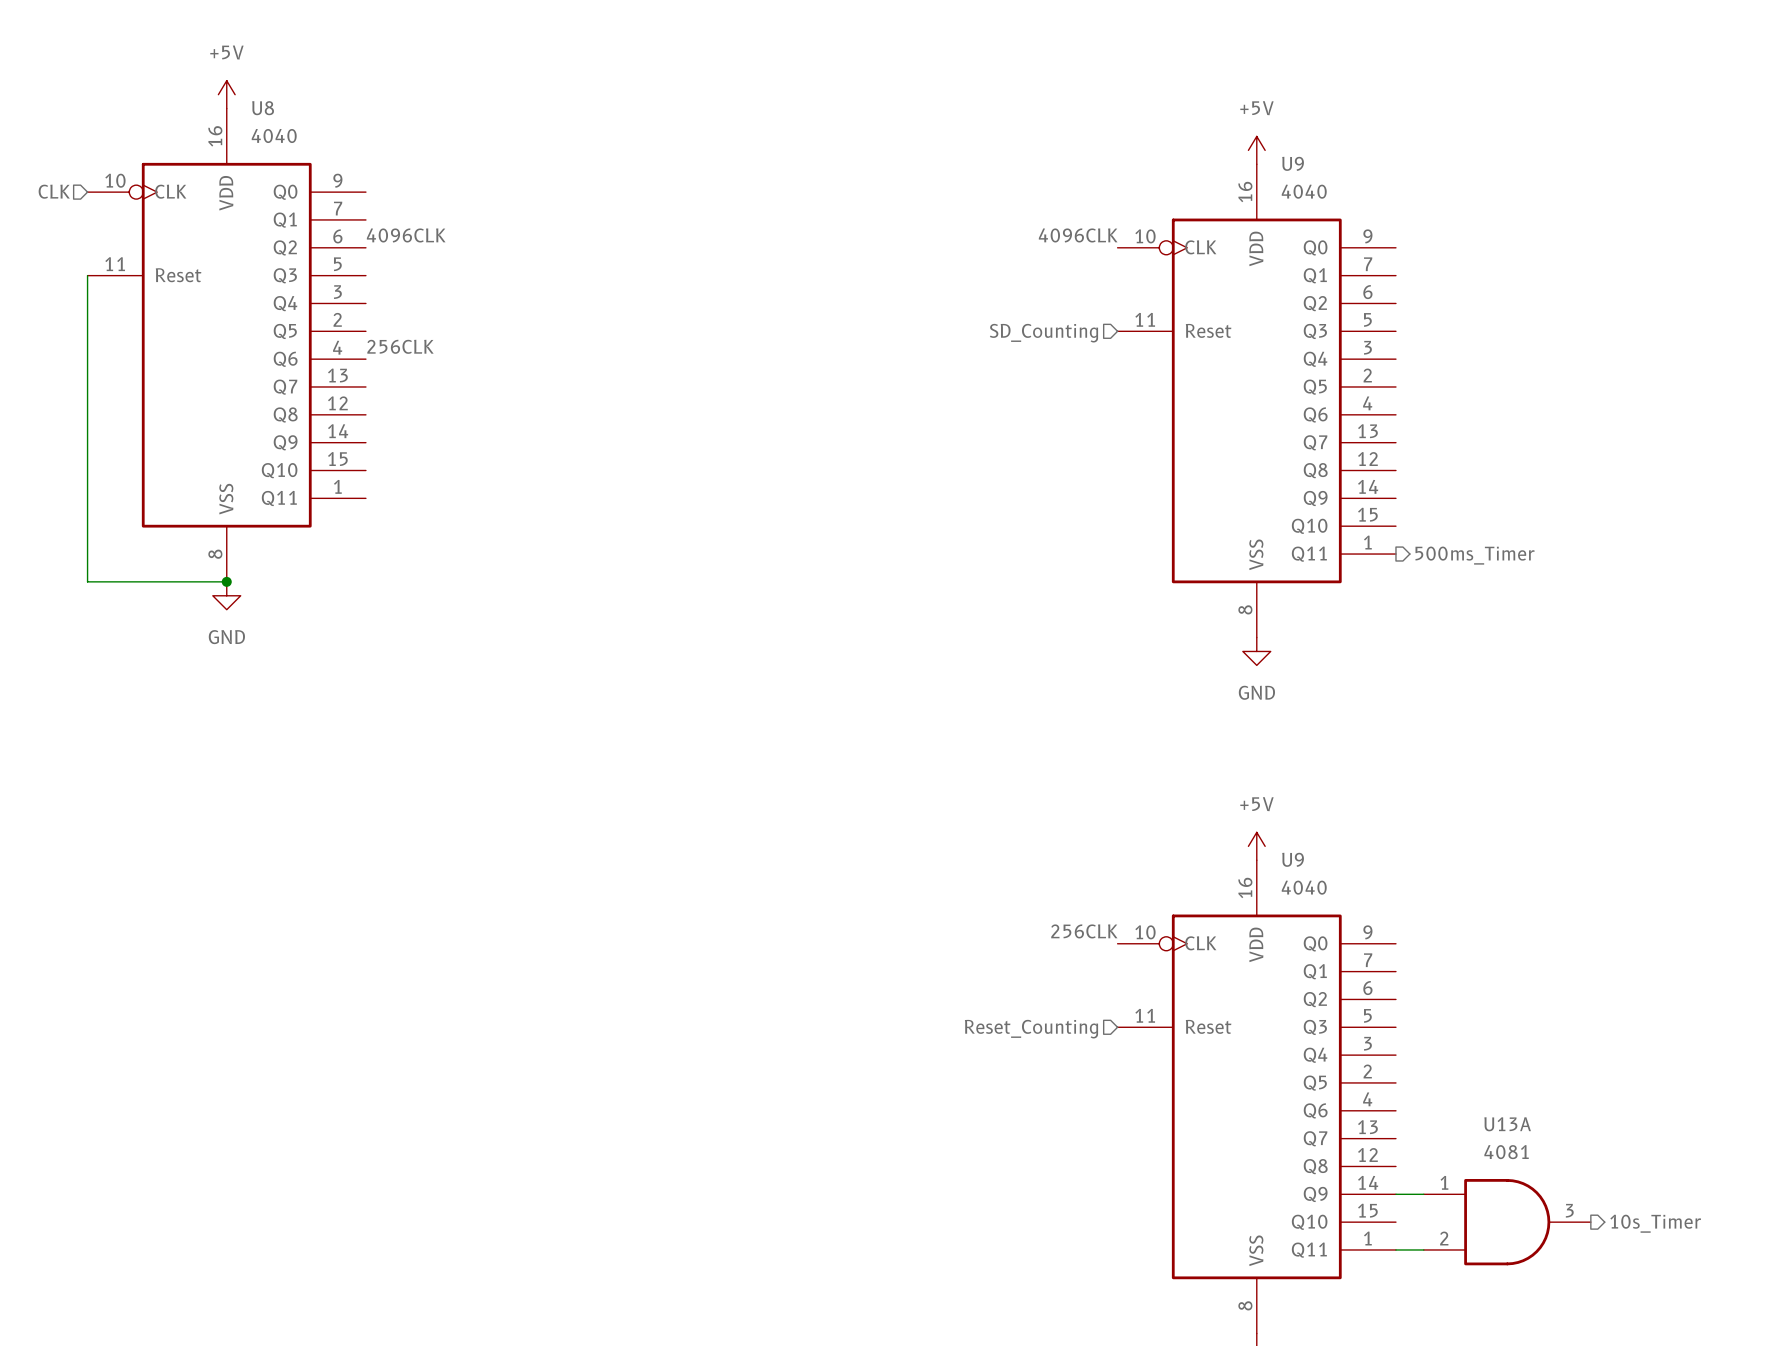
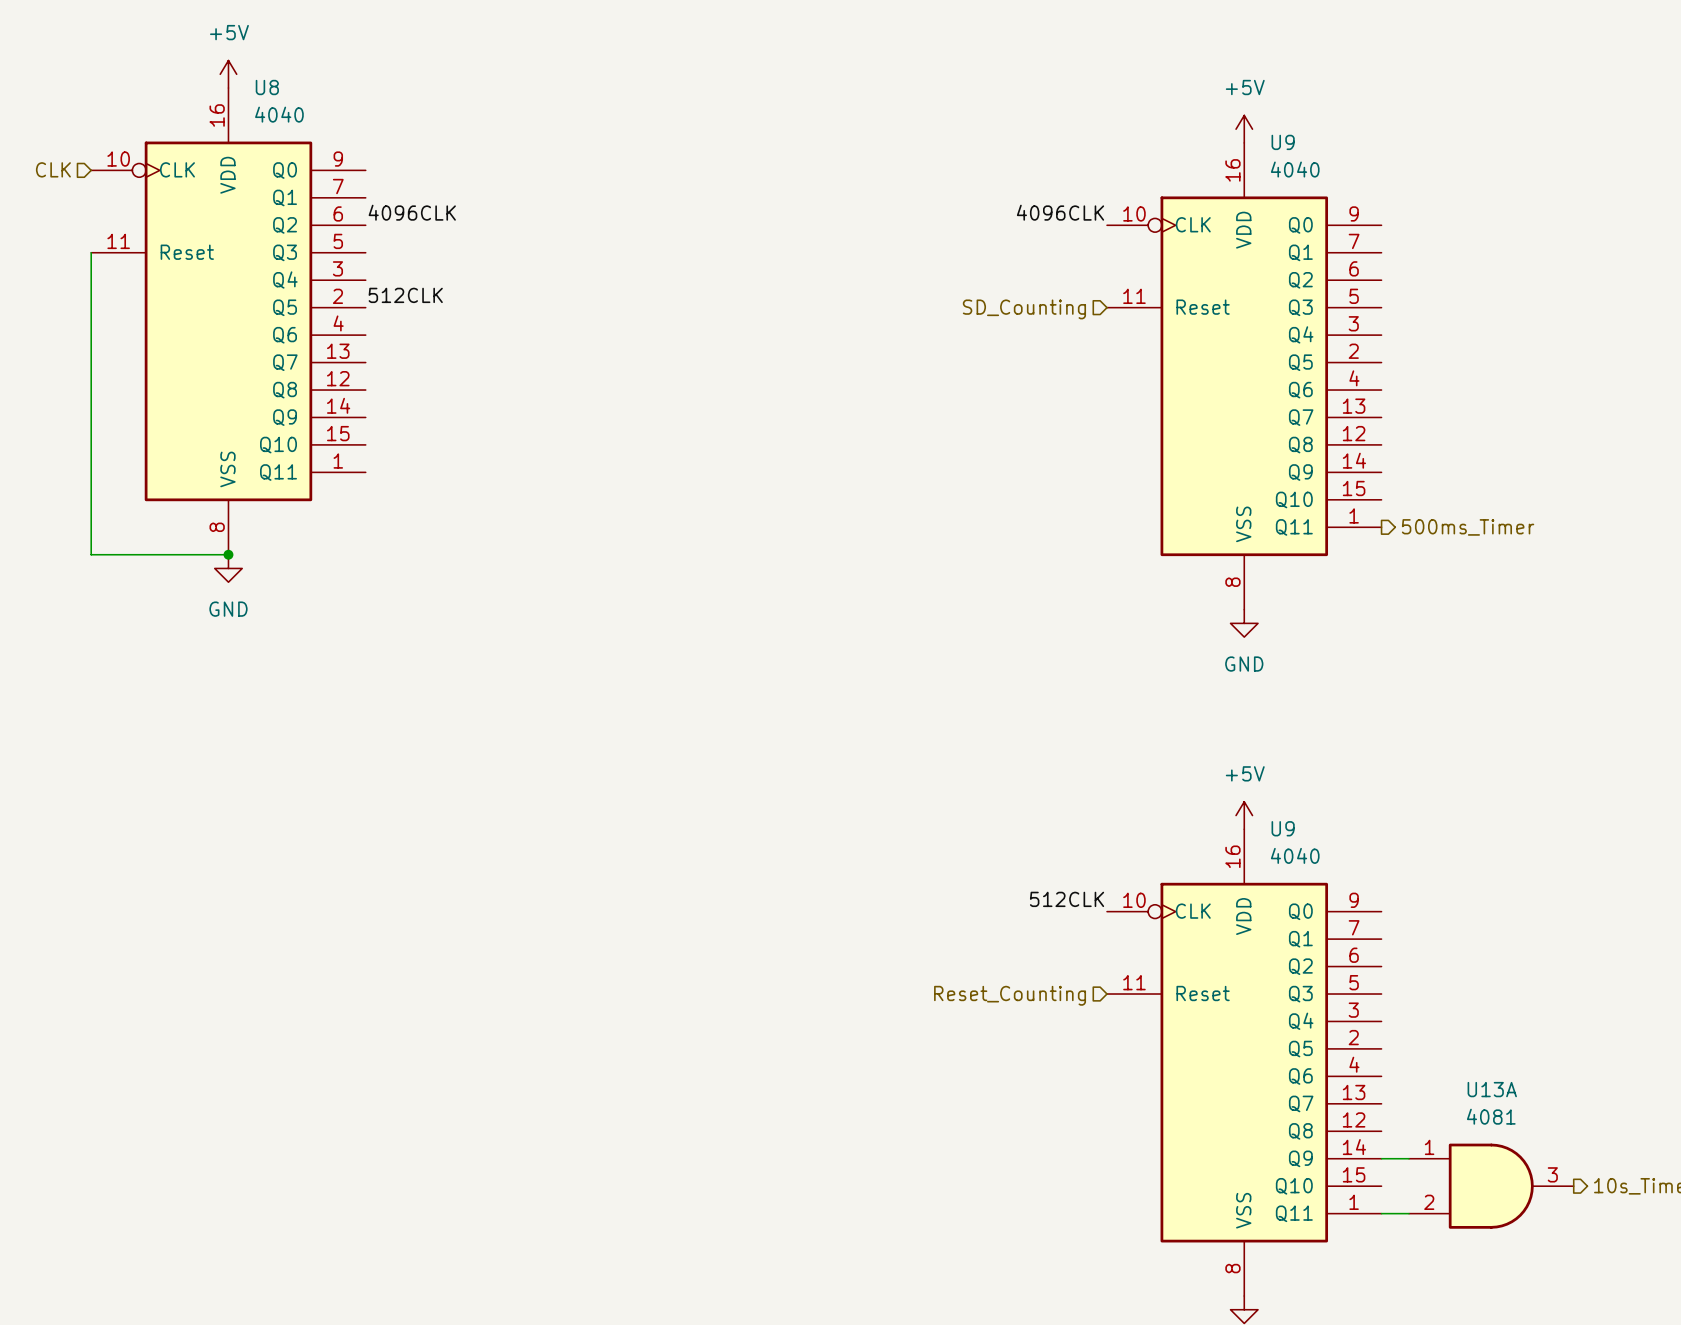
label: 256CLK (400, 346) -> 512CLK (405, 295)
label: 256CLK (1084, 931) -> 512CLK (1067, 899)

